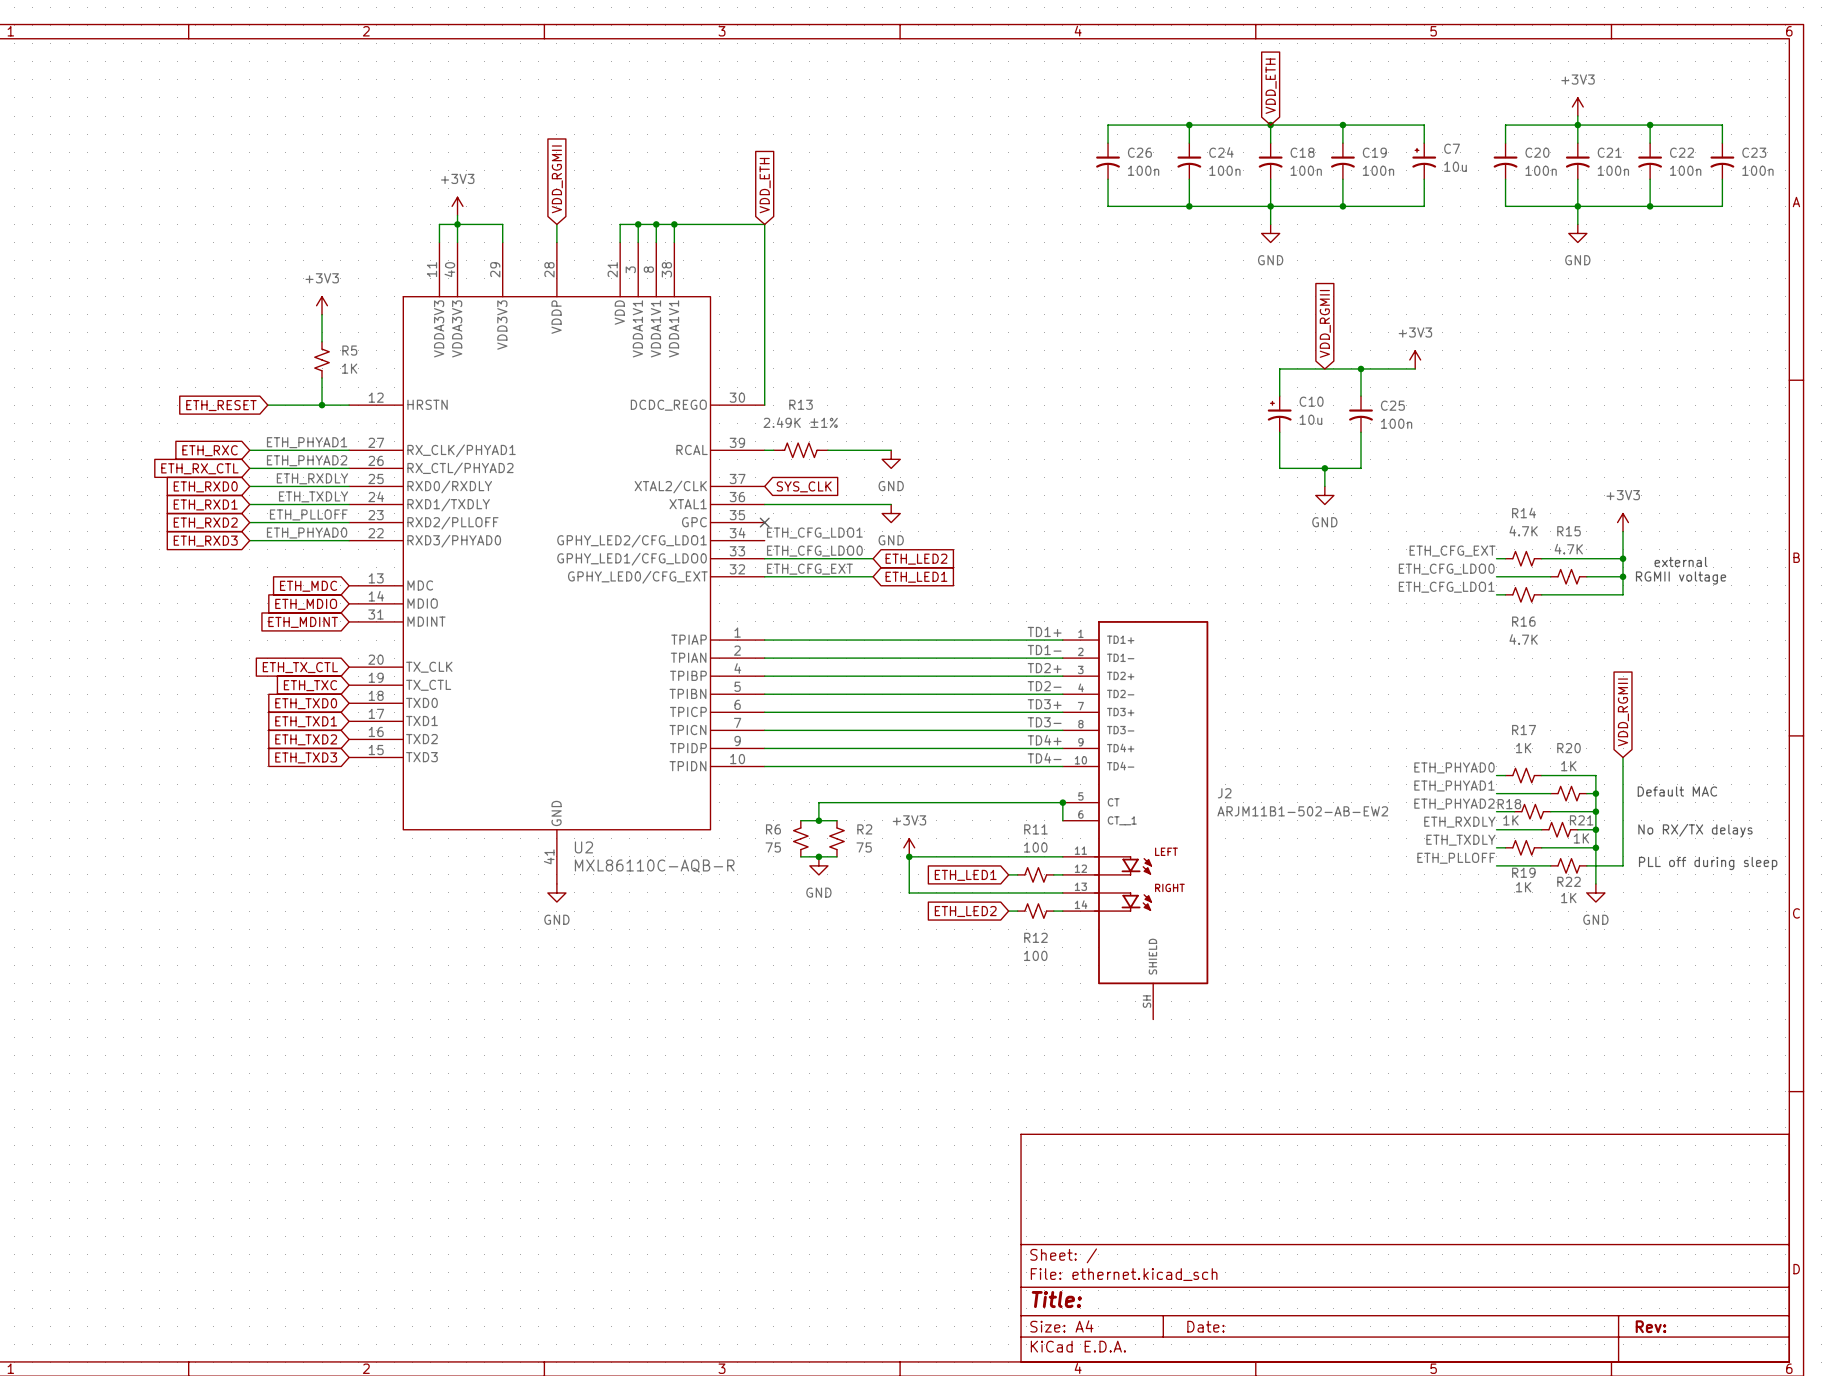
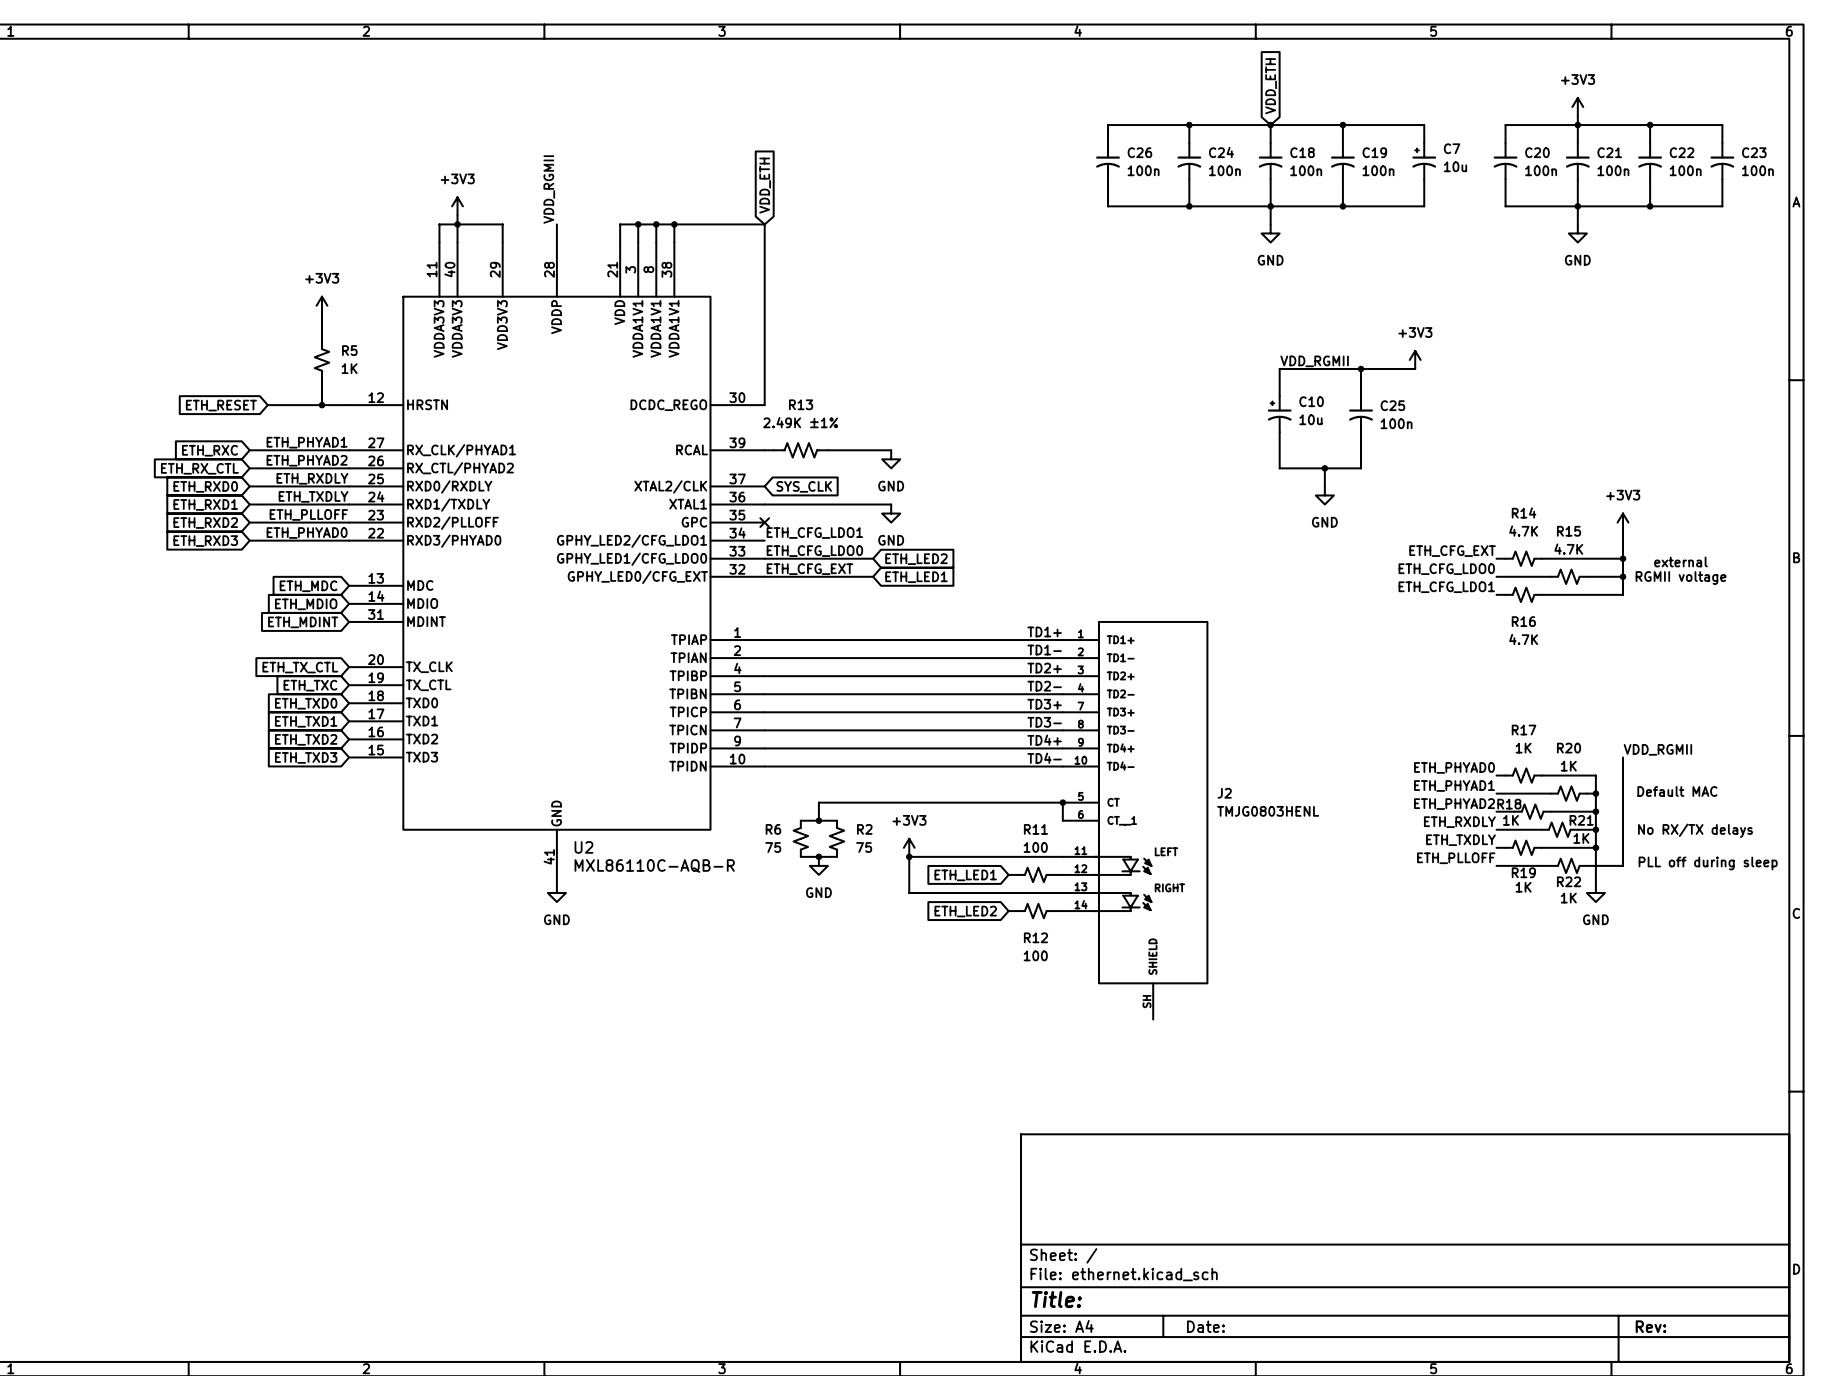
global label: VDD_RGMII (557, 179) -> none
label: none -> VDD_RGMII (549, 189)
global label: VDD_RGMII (1325, 323) -> none
label: none -> VDD_RGMII (1314, 361)
global label: VDD_RGMII (1623, 712) -> none
label: none -> VDD_RGMII (1657, 749)
J2 value: ARJM11B1-502-AB-EW2 (1302, 811) -> TMJG0803HENL (1268, 811)

